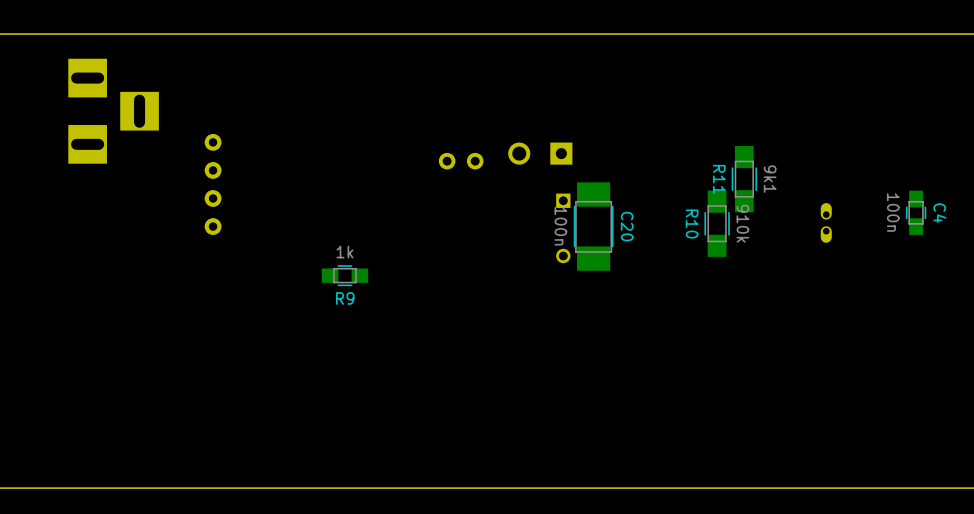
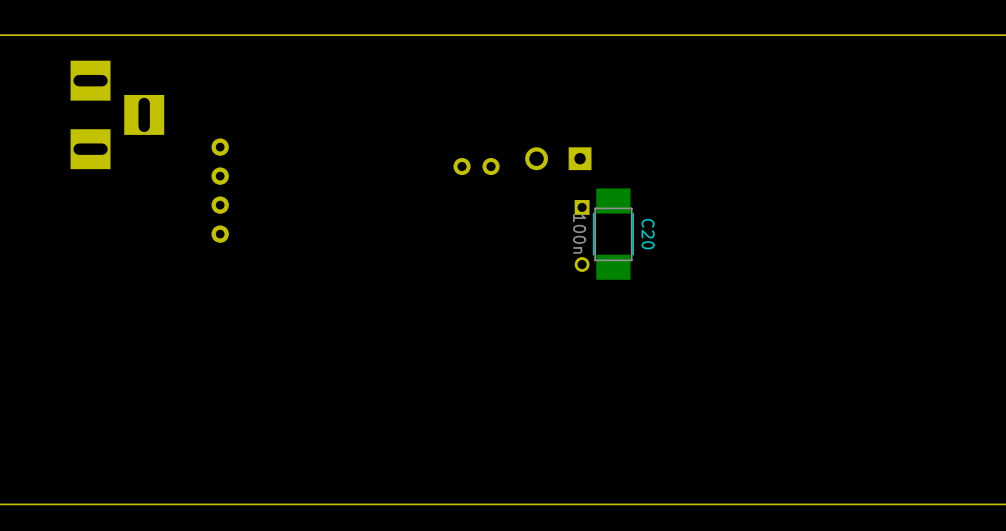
R11: 9k1 (744, 179) -> none
C4: 100n (916, 212) -> none
part: (826, 222) -> none
R10: 910k (717, 223) -> none
R9: 1k (344, 275) -> none

